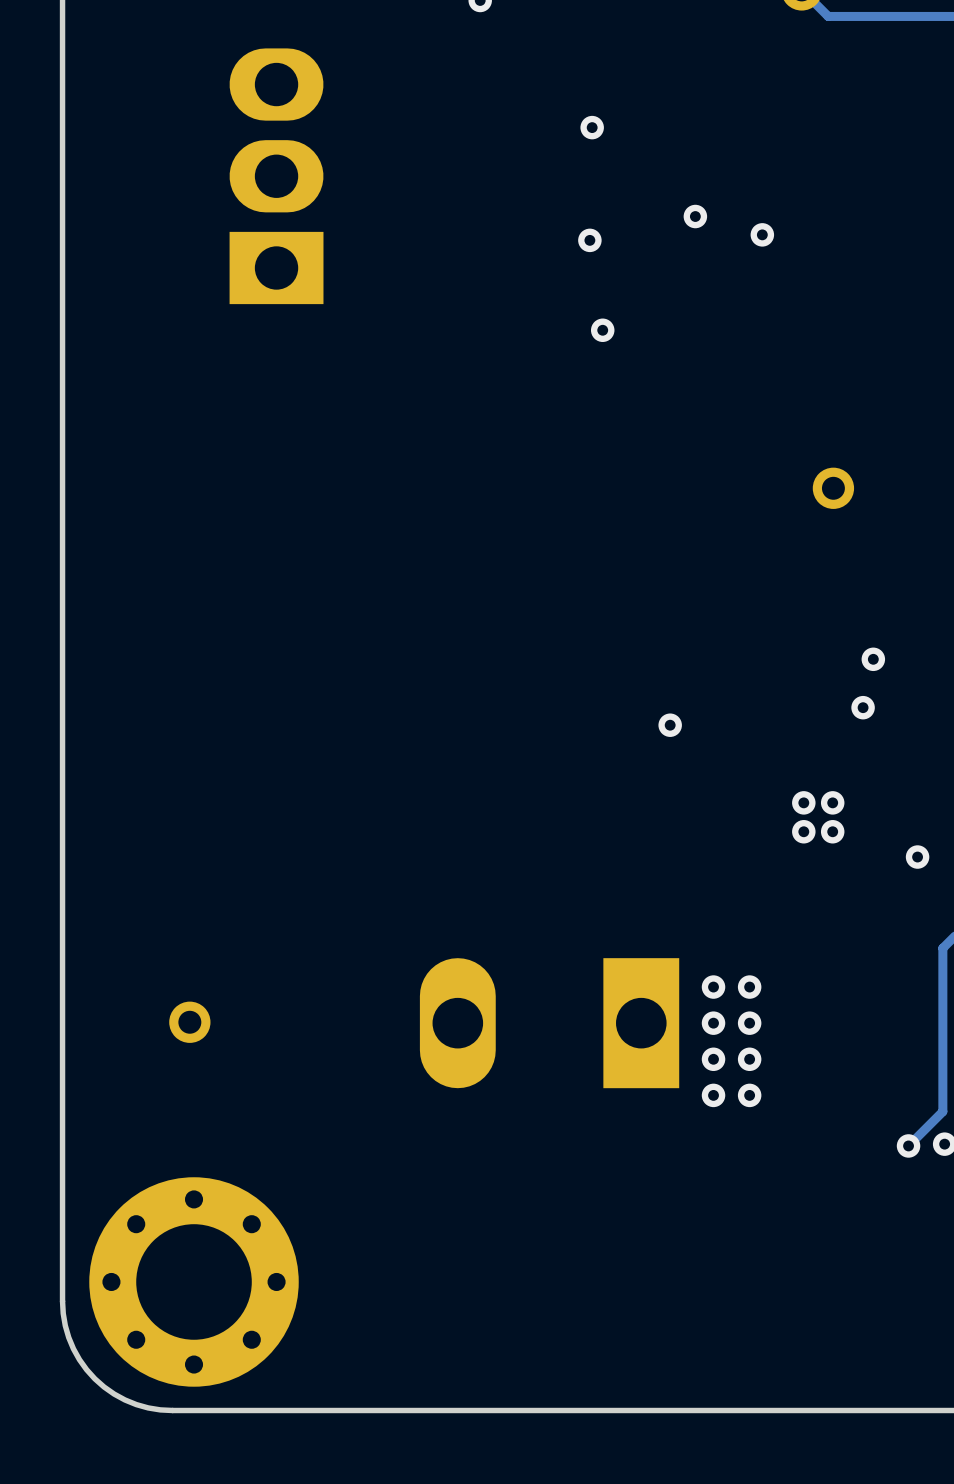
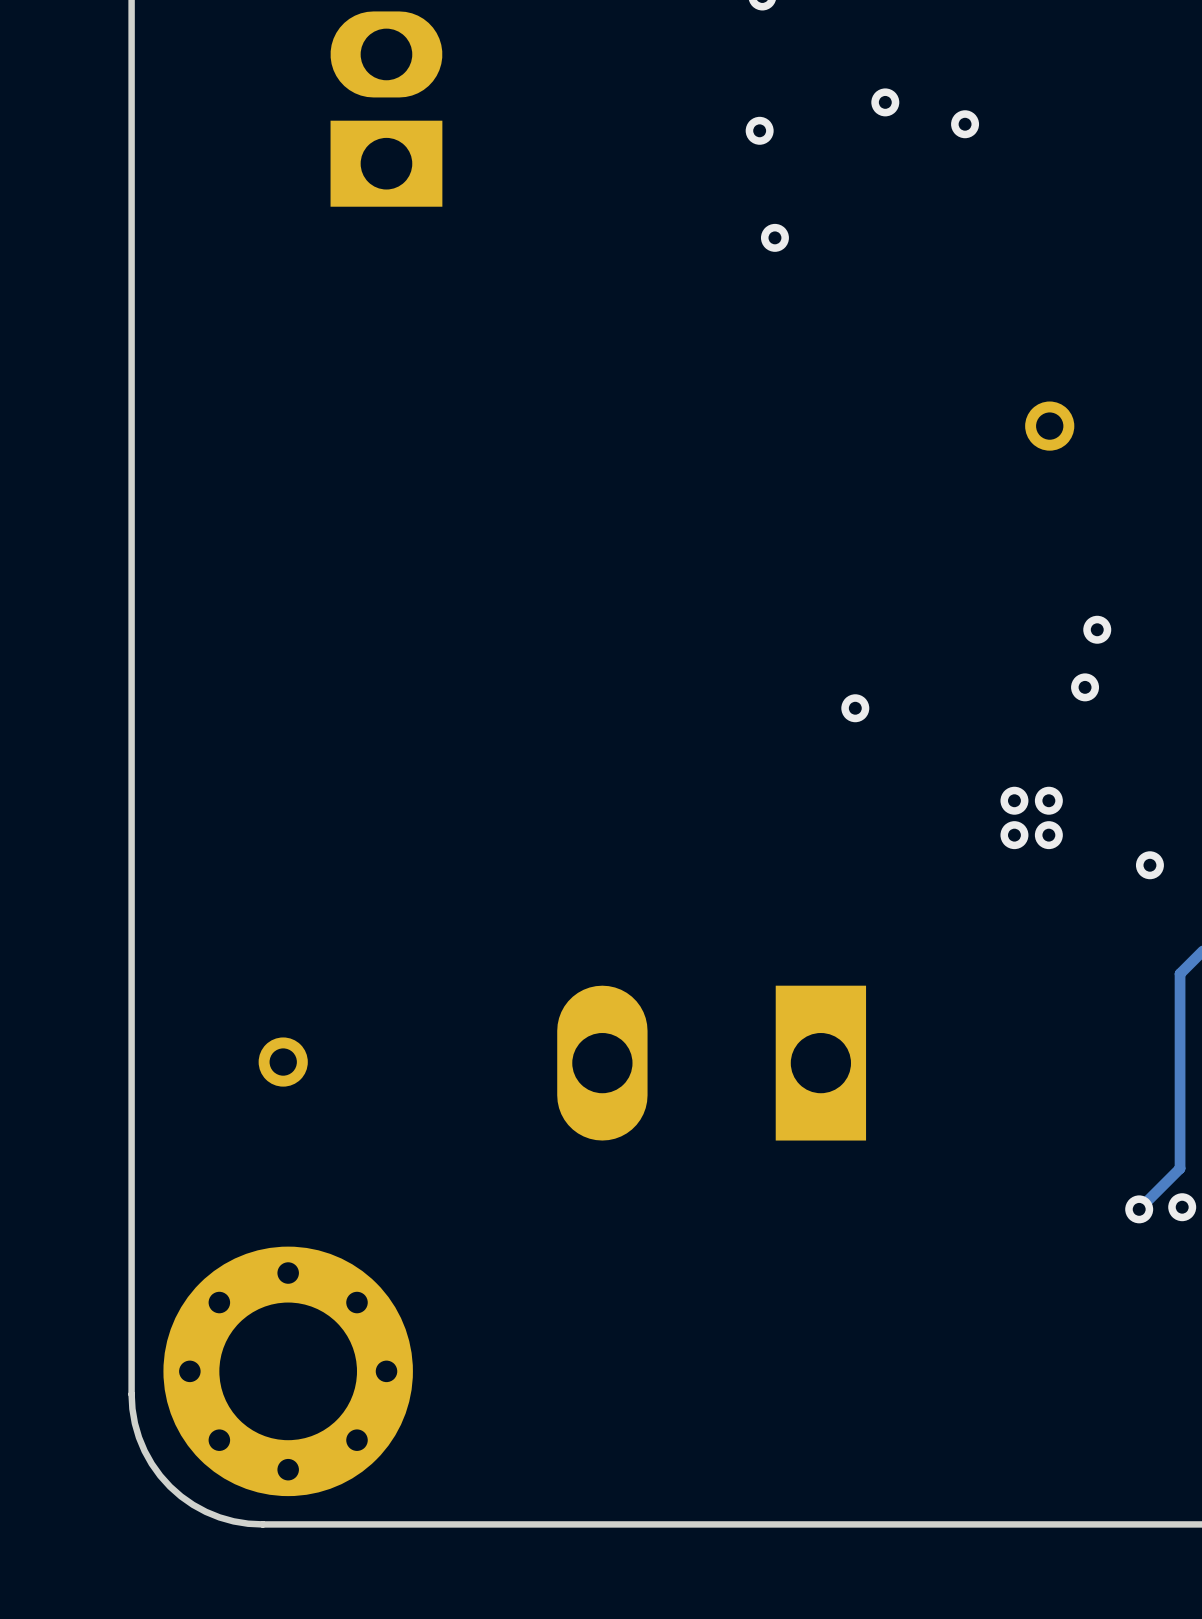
via: (713, 987) -> none
via: (749, 987) -> none
via: (713, 1023) -> none
via: (749, 1023) -> none
via: (713, 1059) -> none
via: (749, 1059) -> none
via: (713, 1095) -> none
via: (749, 1095) -> none

